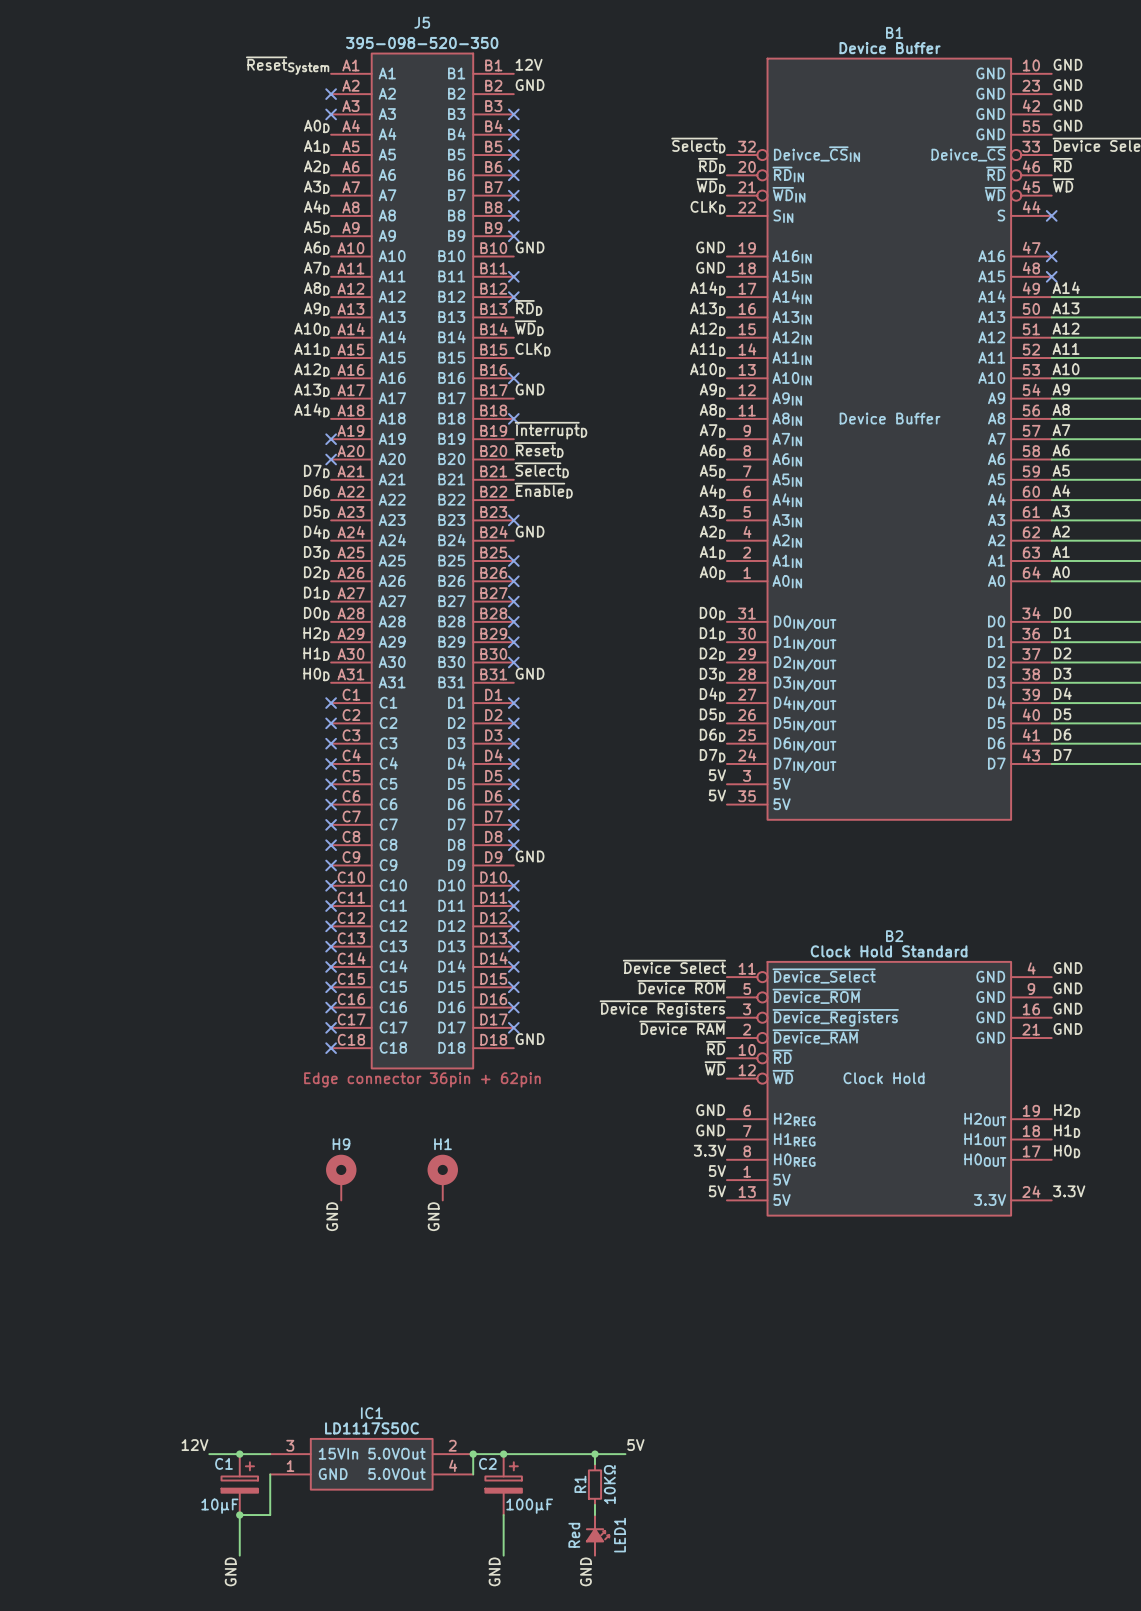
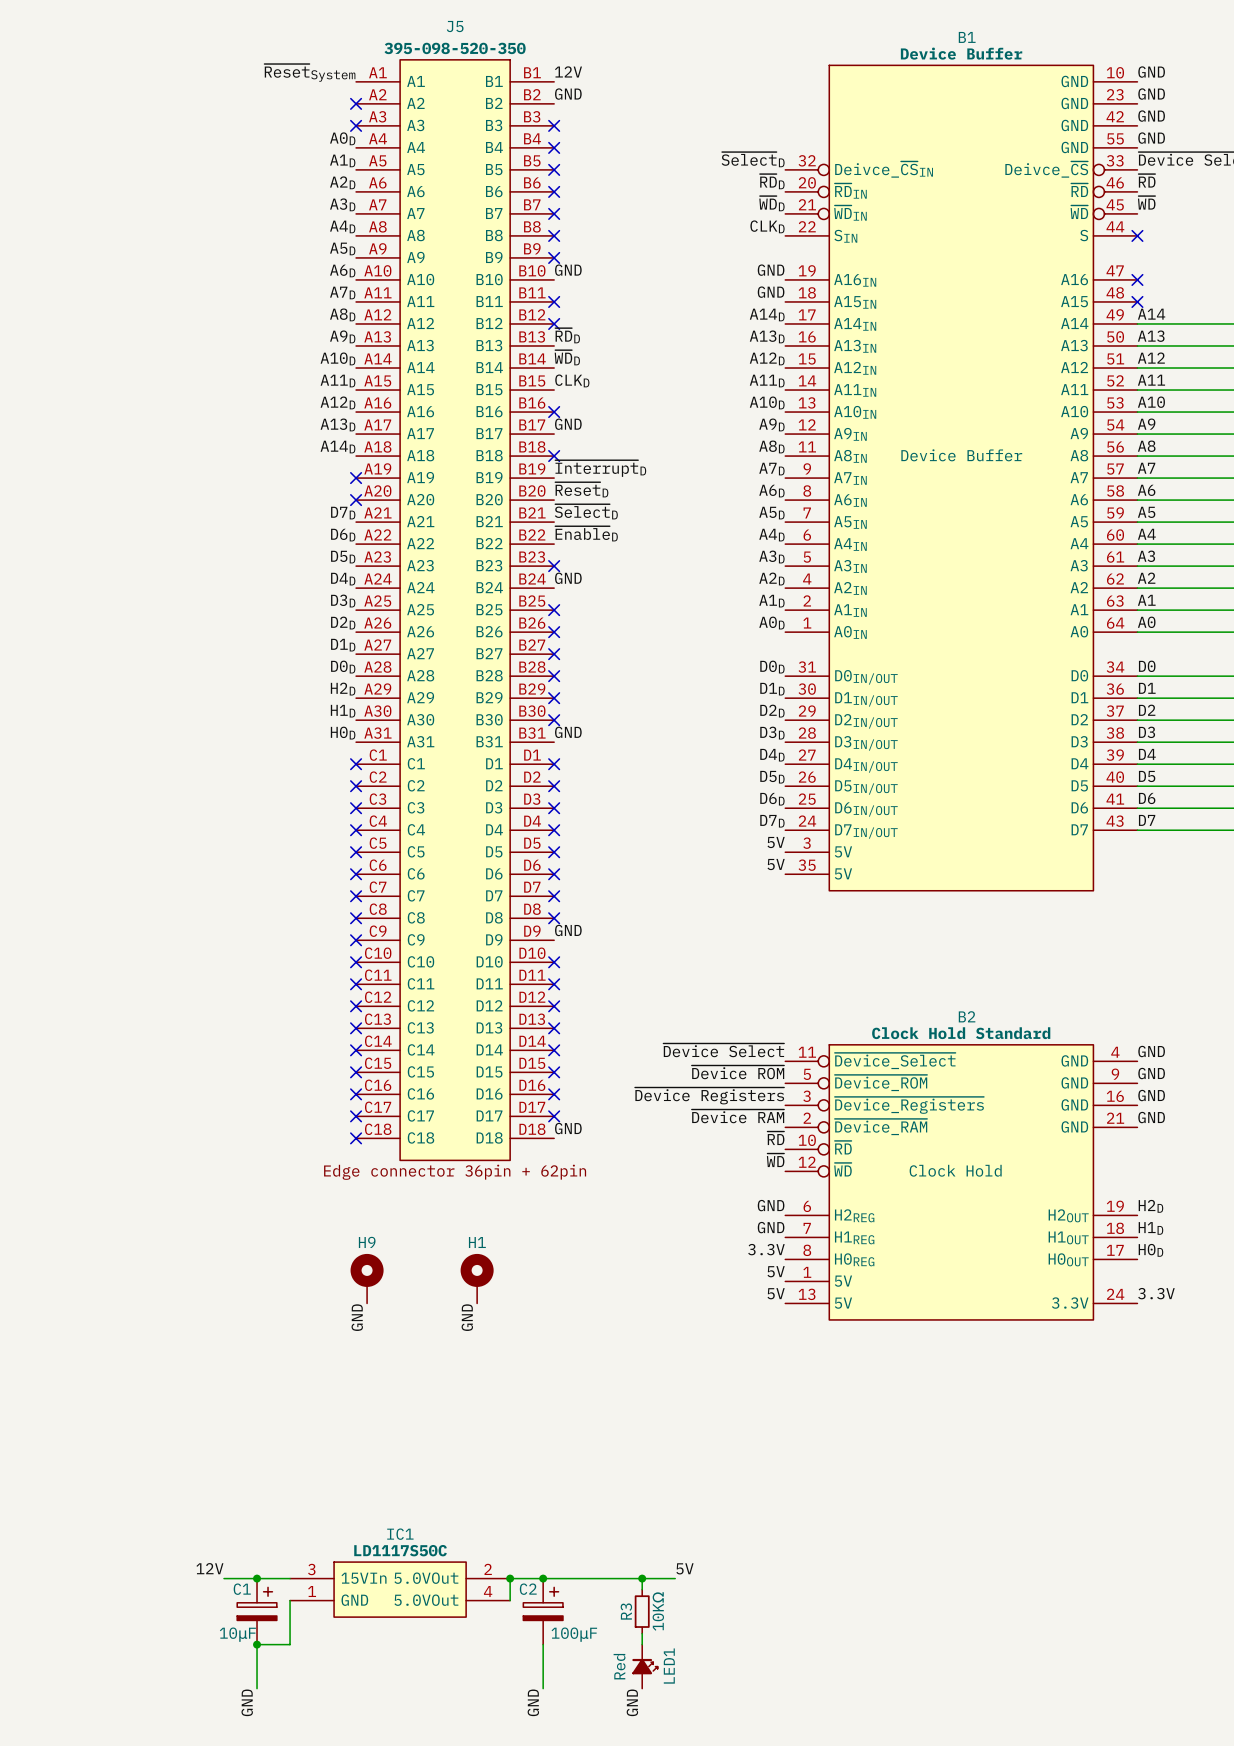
R1 name: R1 (580, 1484) -> R3 (626, 1611)

